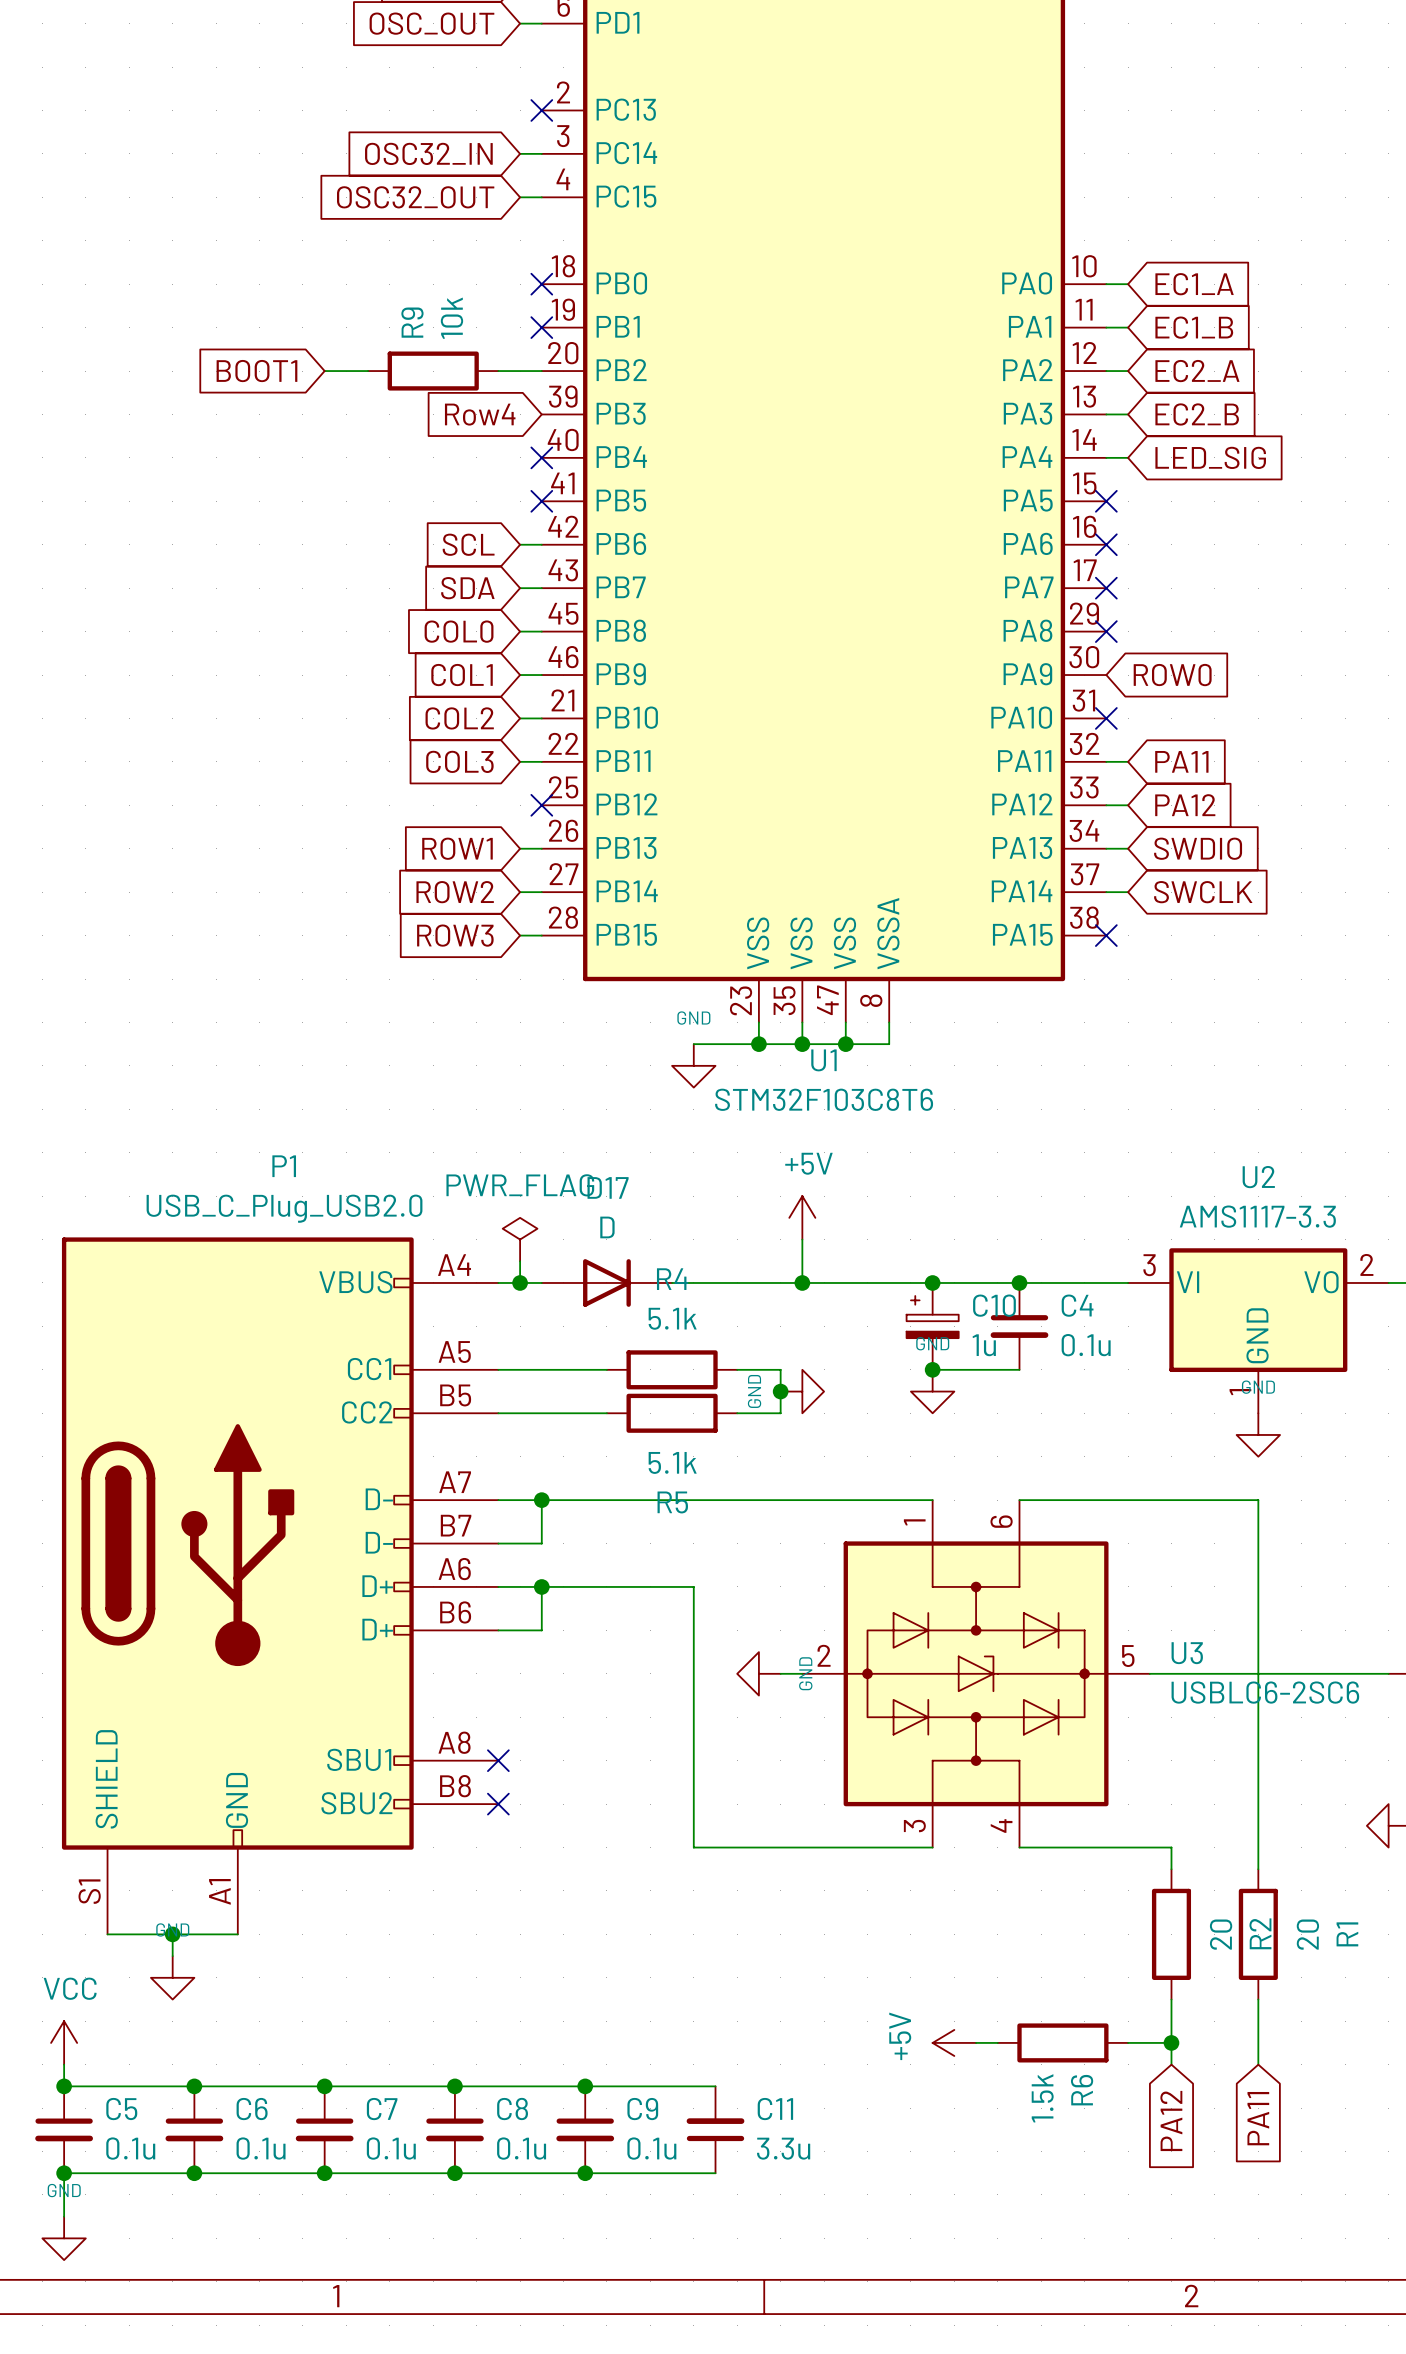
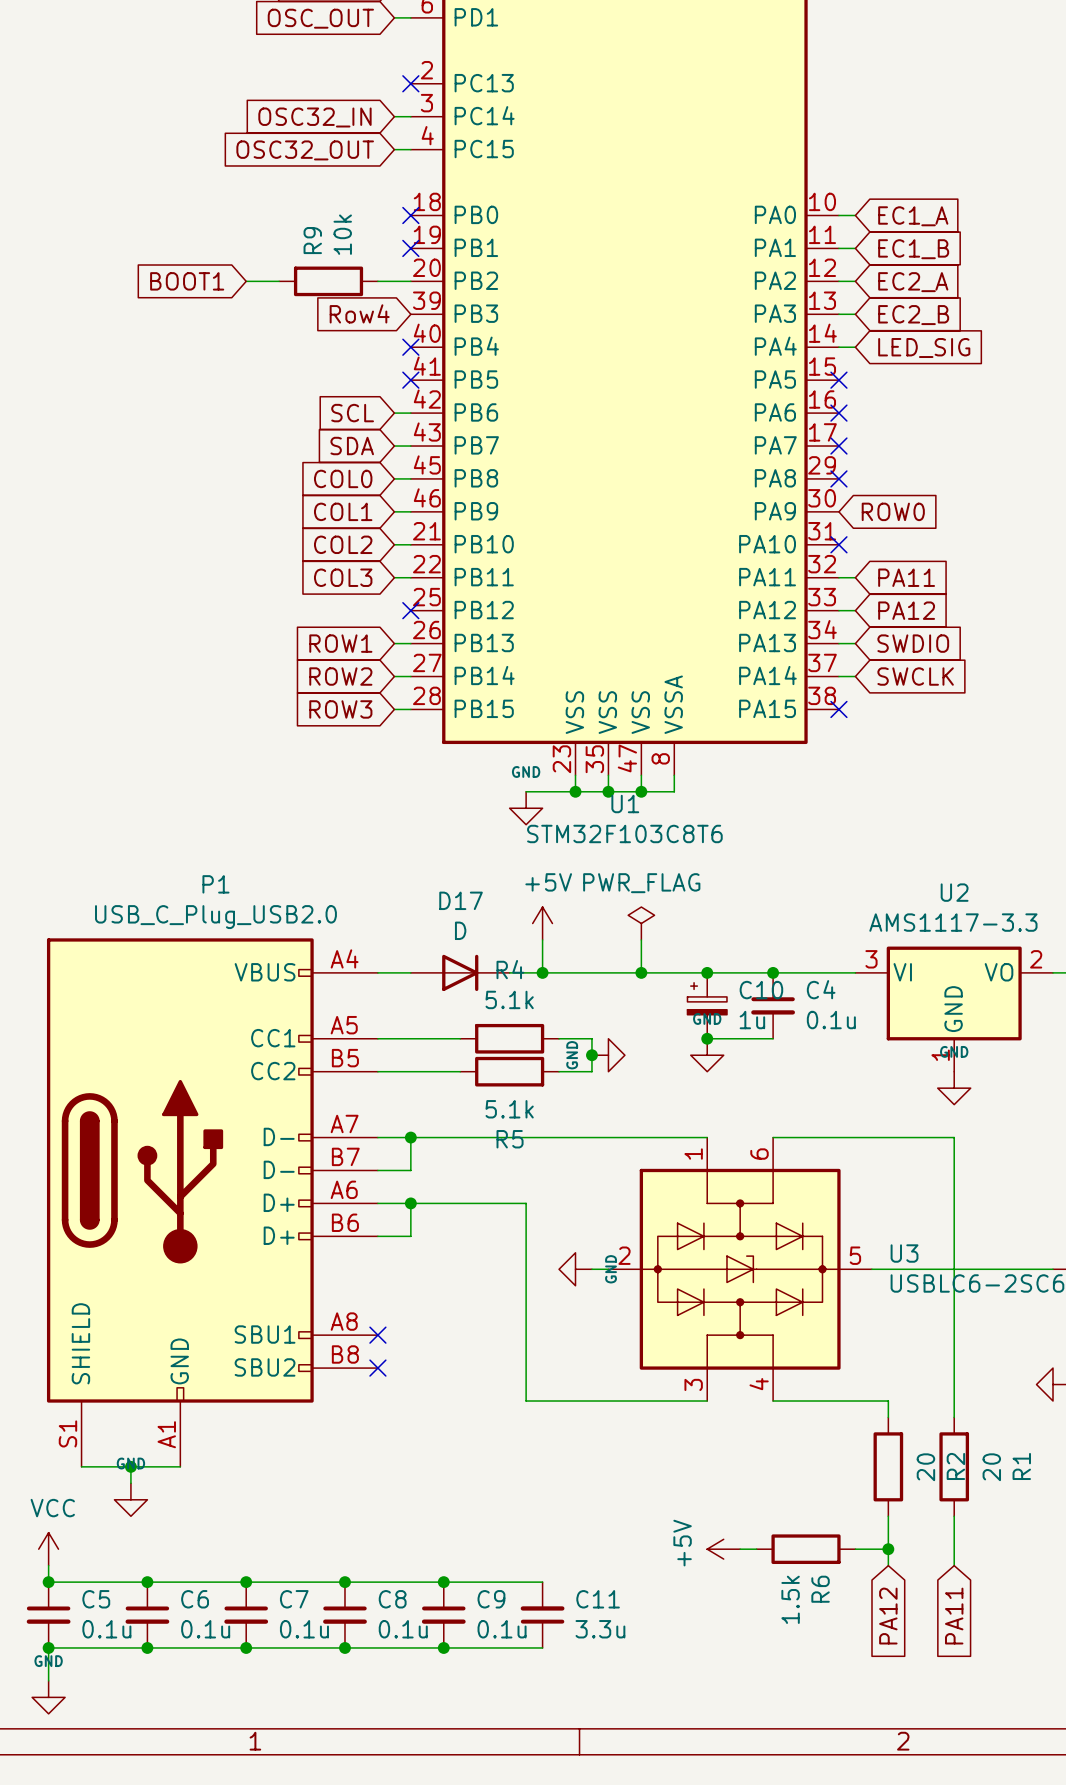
power symbol position: +5V (802, 1217) -> +5V (542, 923)
power symbol position: PWR_FLAG (520, 1239) -> PWR_FLAG (641, 923)
wire: none -> (542, 939) (542, 972)
wire: (802, 1239) (802, 1282) -> (641, 939) (641, 972)
wire: (520, 1261) (520, 1282) -> none
junction: (520, 1282) -> none
junction: none -> (542, 972)
junction: (802, 1282) -> none
junction: none -> (641, 972)

